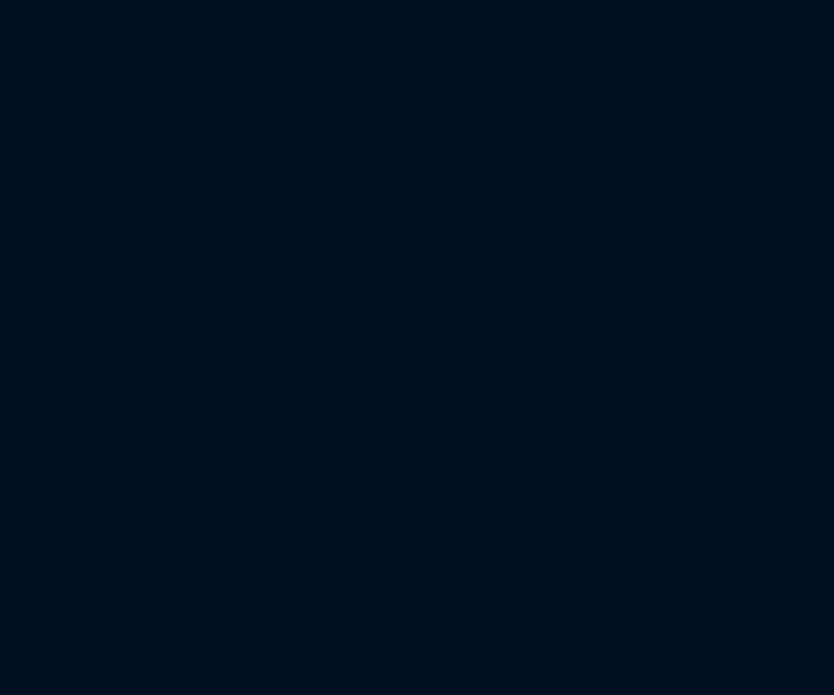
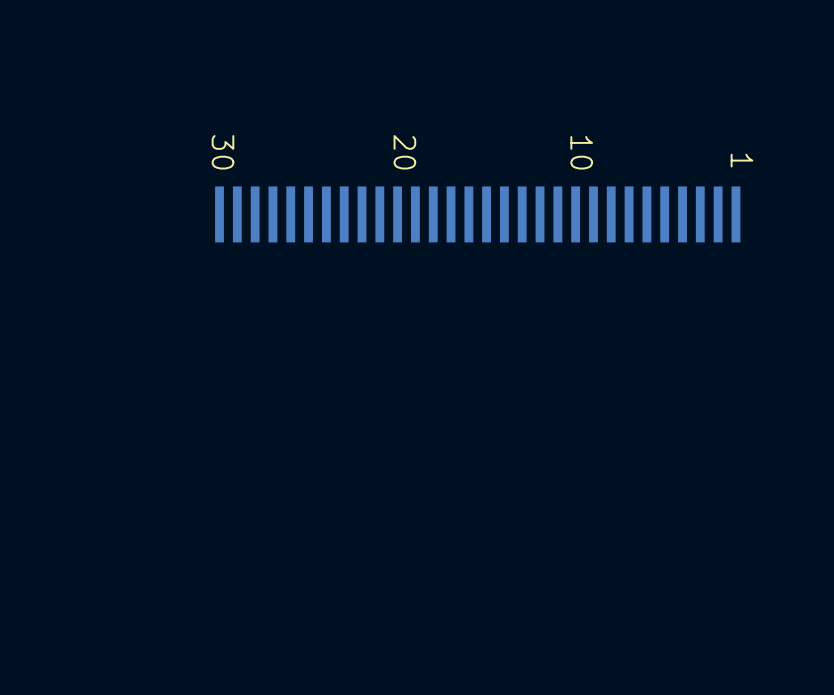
part: none -> (477, 214)

